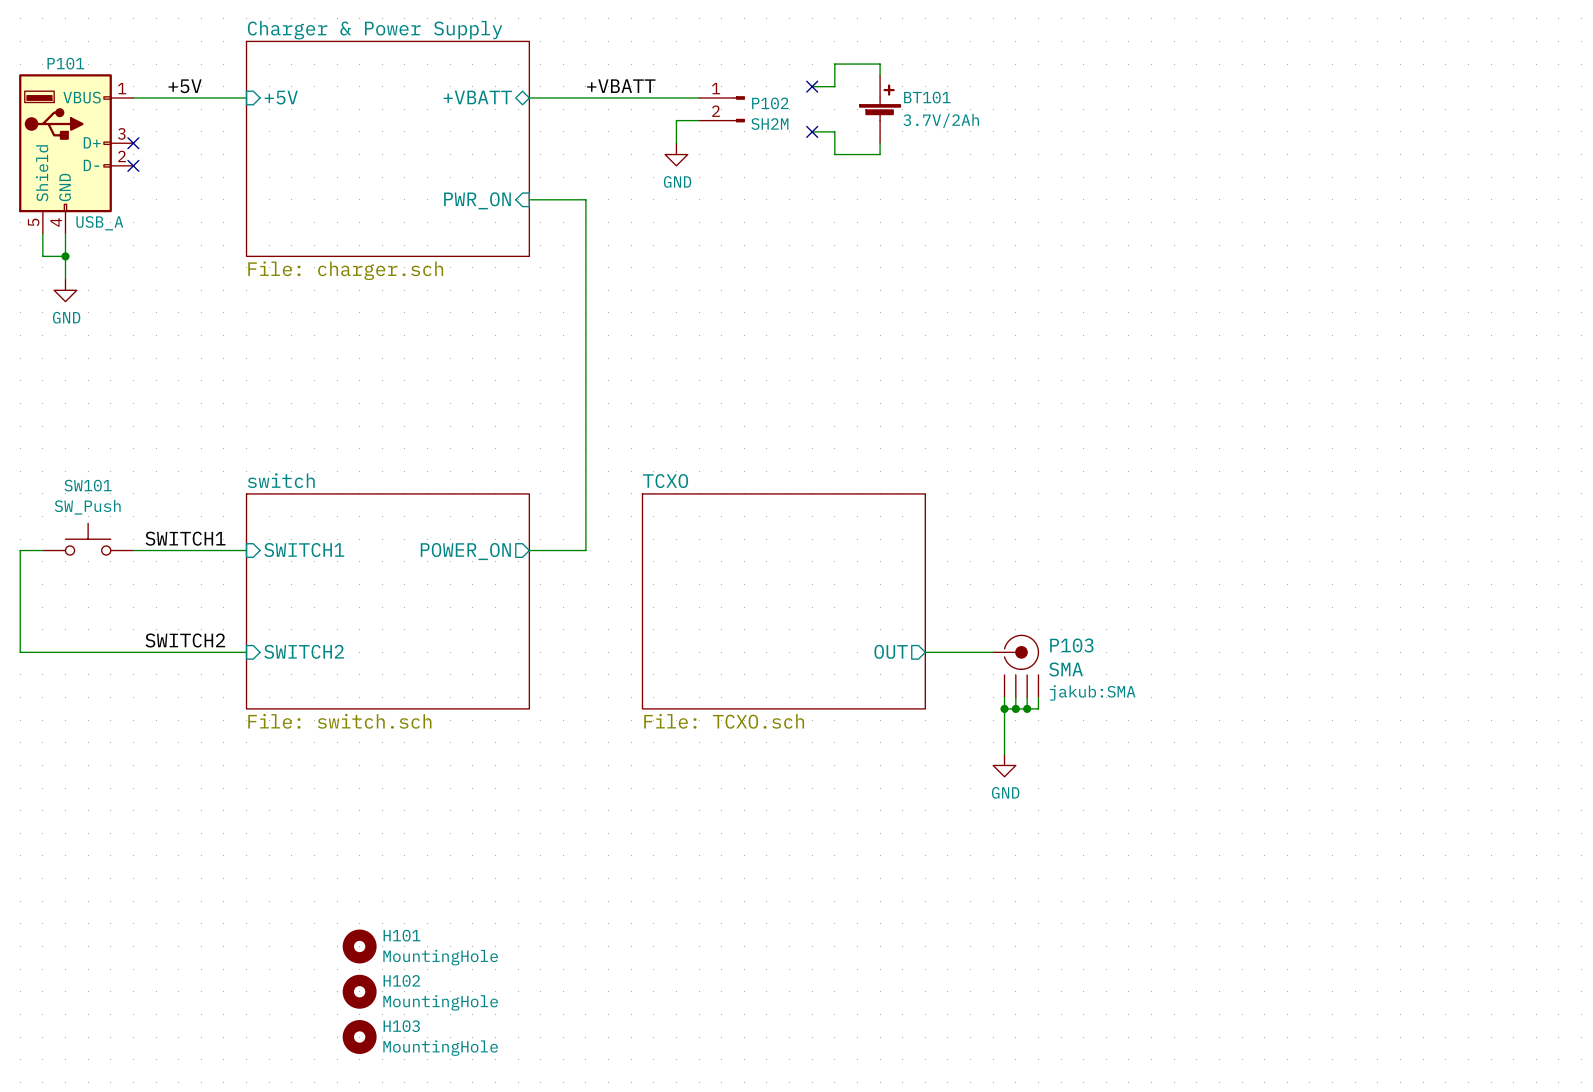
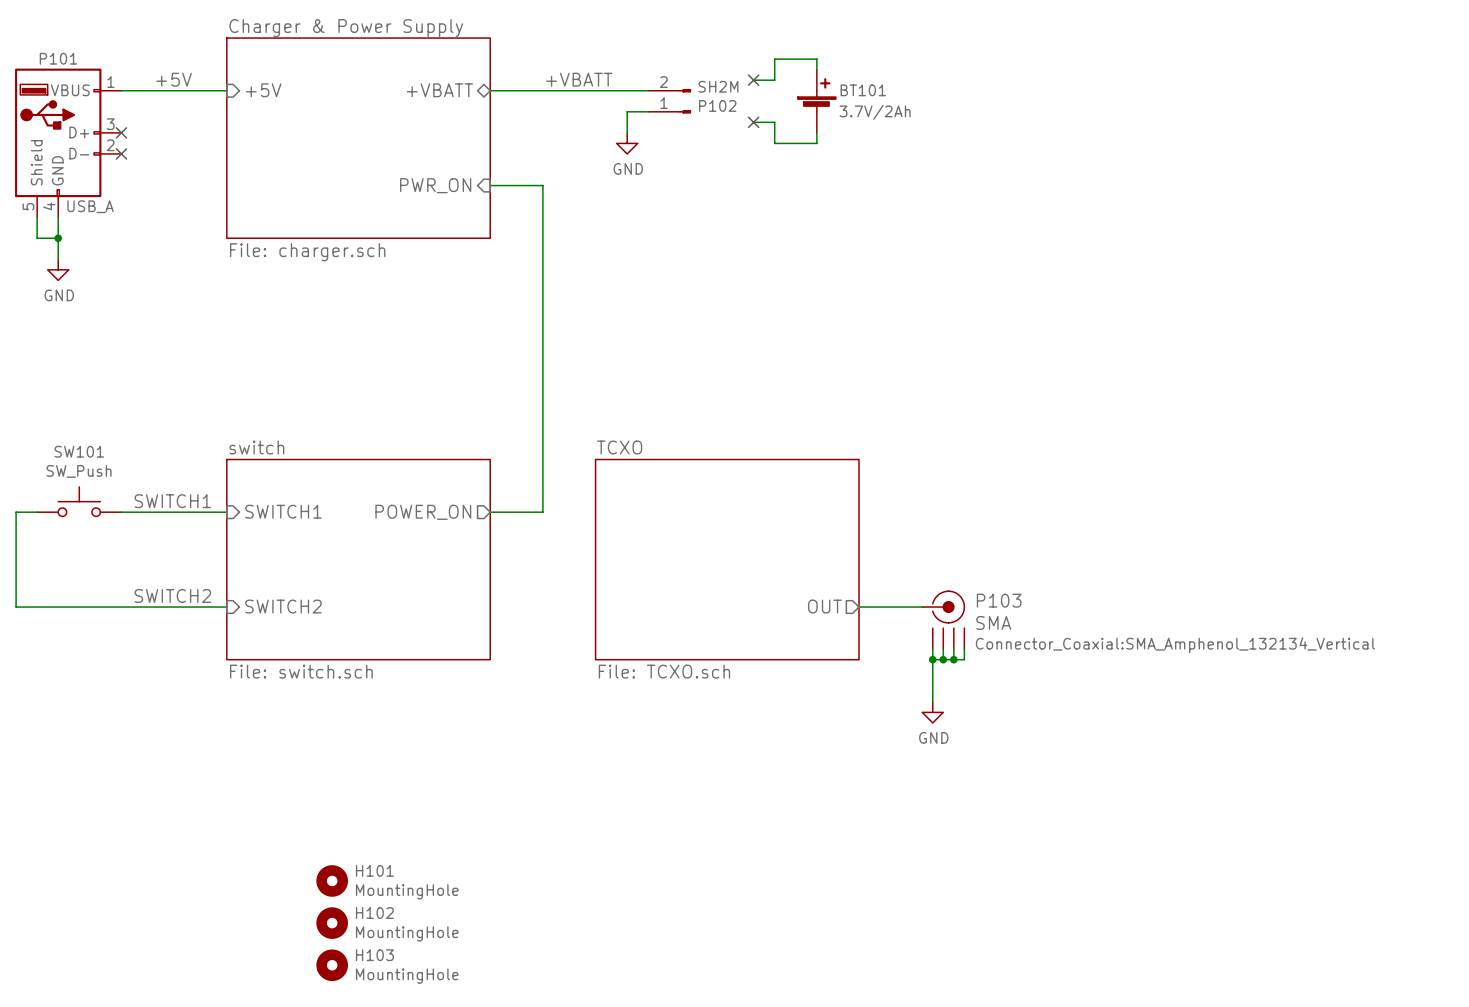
P102 flip: as is (738, 109) -> up-down (685, 101)
P103 text: jakub:SMA (1092, 692) -> Connector_Coaxial:SMA_Amphenol_132134_Vertical (1175, 645)

